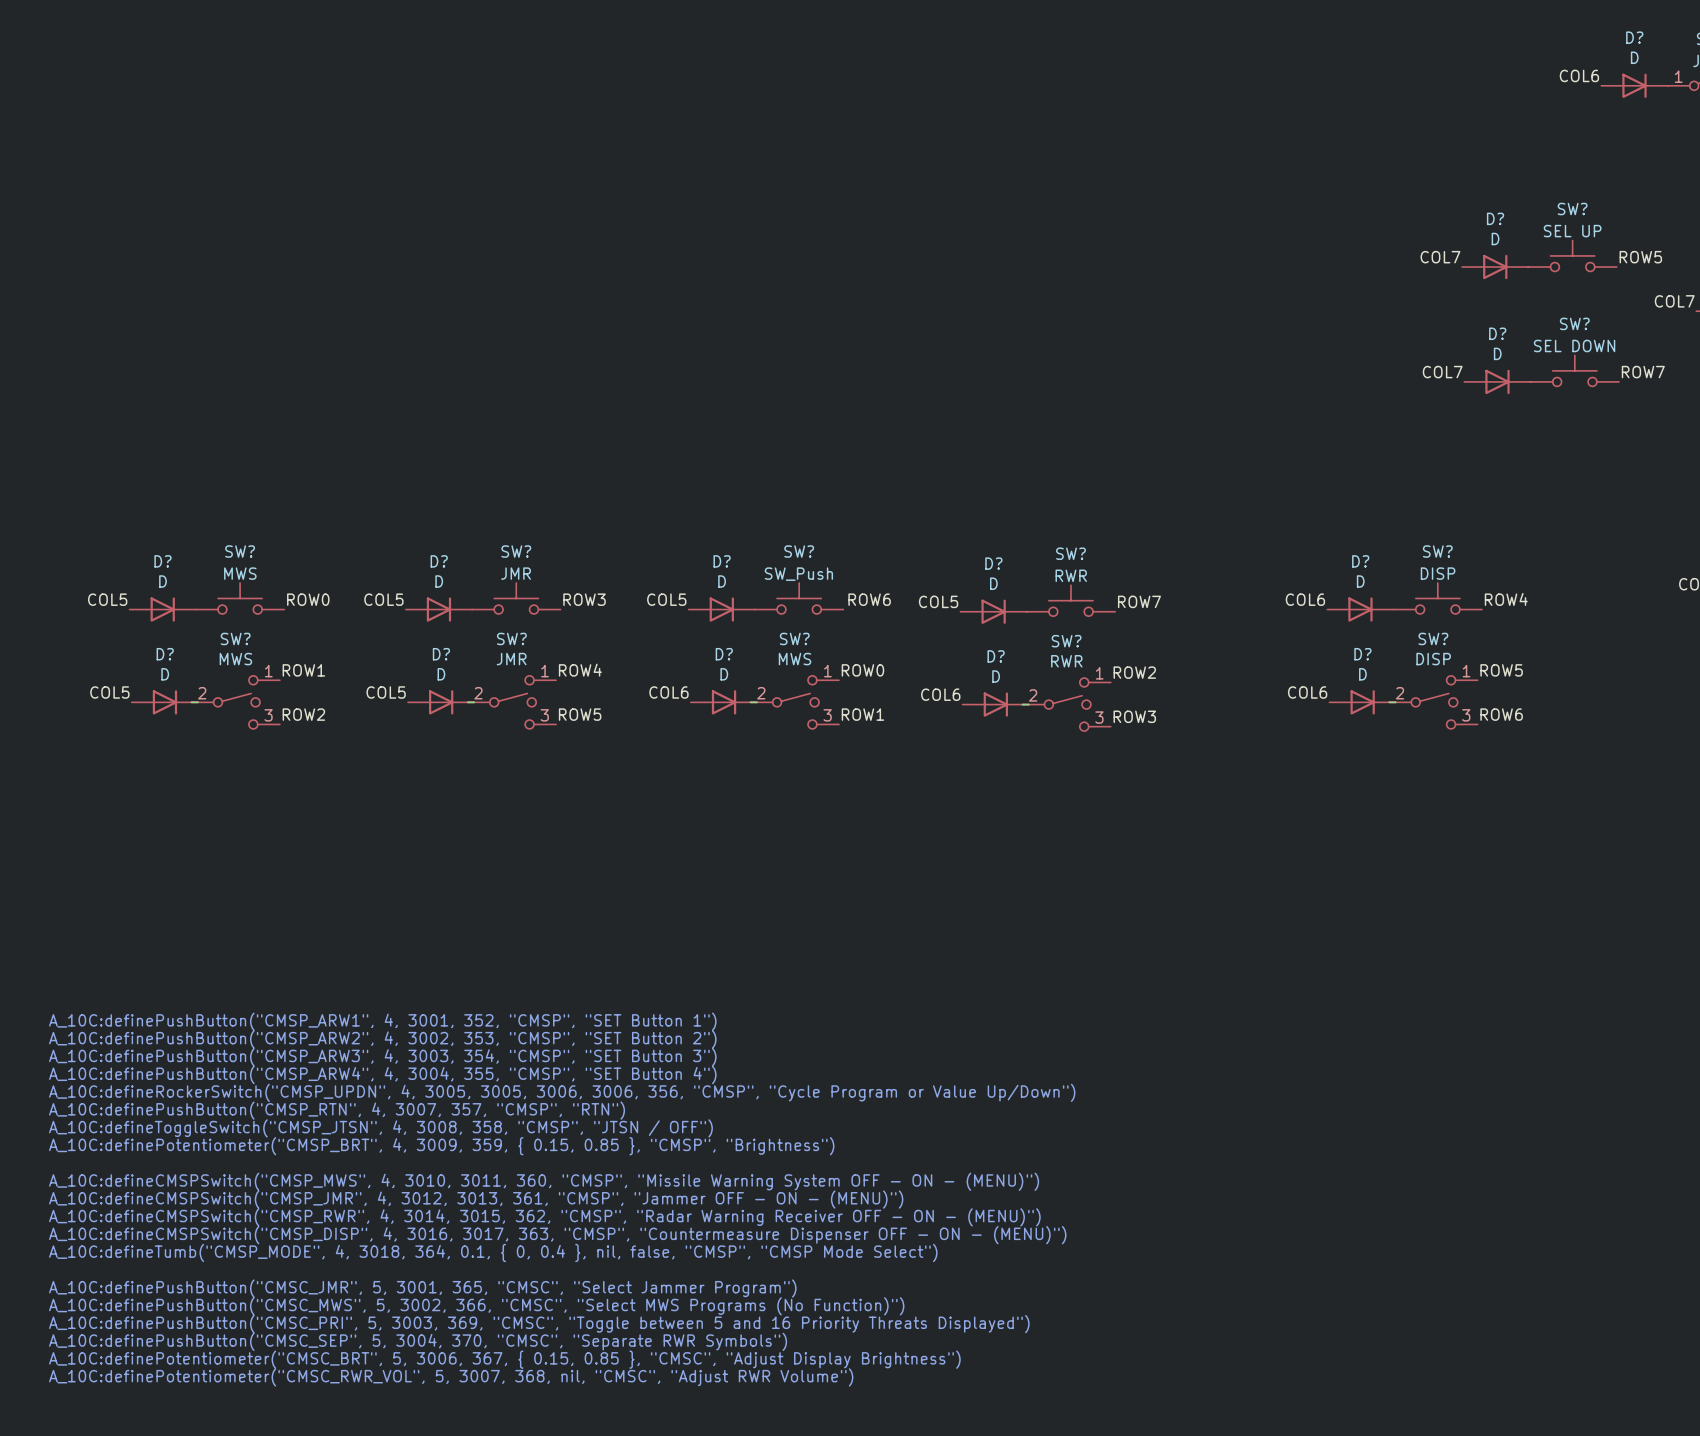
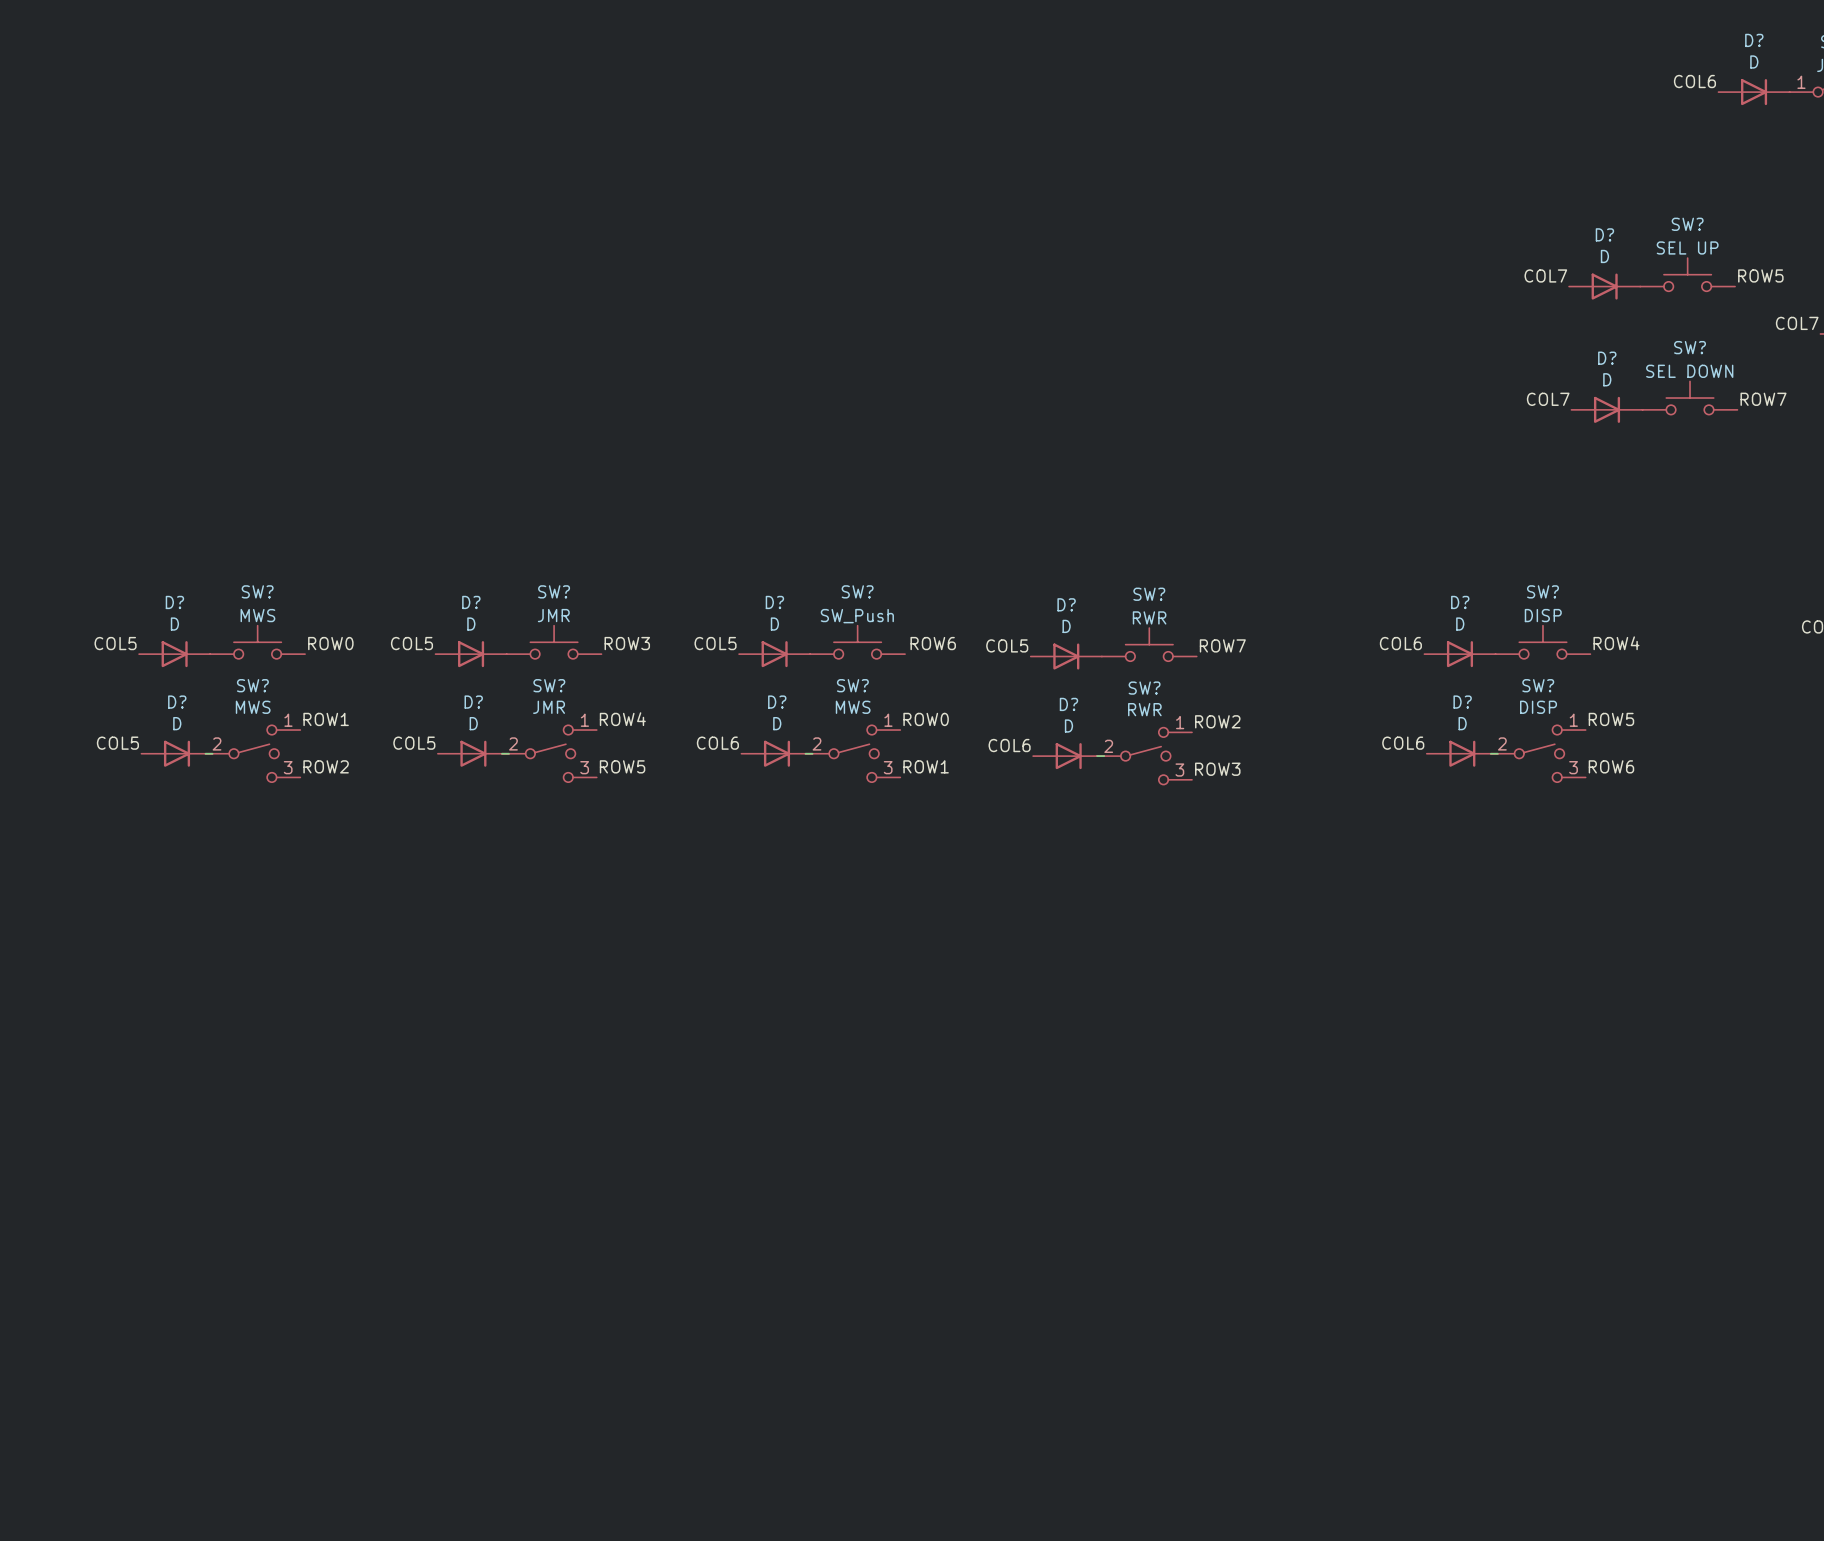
text: A_10C:definePushButton("CMSP_ARW1", 4, 3001, 352, "CMSP", "SET Button 1") (382, 1021) -> none
text: A_10C:definePushButton("CMSP_ARW2", 4, 3002, 353, "CMSP", "SET Button 2") (382, 1039) -> none
text: A_10C:definePushButton("CMSP_ARW3", 4, 3003, 354, "CMSP", "SET Button 3") (382, 1057) -> none
text: A_10C:definePushButton("CMSP_ARW4", 4, 3004, 355, "CMSP", "SET Button 4") (382, 1075) -> none
text: A_10C:defineRockerSwitch("CMSP_UPDN", 4, 3005, 3005, 3006, 3006, 356, "CMSP", "Cycle Program or Value Up/Down") (562, 1092) -> none
text: A_10C:definePushButton("CMSP_RTN", 4, 3007, 357, "CMSP", "RTN") (337, 1110) -> none
text: A_10C:defineToggleSwitch("CMSP_JTSN", 4, 3008, 358, "CMSP", "JTSN / OFF") (380, 1128) -> none
text: A_10C:definePotentiometer("CMSP_BRT", 4, 3009, 359, { 0.15, 0.85 }, "CMSP", "Brightness") (441, 1146) -> none
text: A_10C:defineCMSPSwitch("CMSP_MWS", 4, 3010, 3011, 360, "CMSP", "Missile Warning System OFF - ON - (MENU)") (544, 1181) -> none
text: A_10C:defineCMSPSwitch("CMSP_JMR", 4, 3012, 3013, 361, "CMSP", "Jammer OFF - ON - (MENU)") (476, 1199) -> none
text: A_10C:defineCMSPSwitch("CMSP_RWR", 4, 3014, 3015, 362, "CMSP", "Radar Warning Receiver OFF - ON - (MENU)") (544, 1217) -> none
text: A_10C:defineCMSPSwitch("CMSP_DISP", 4, 3016, 3017, 363, "CMSP", "Countermeasure Dispenser OFF - ON - (MENU)") (557, 1235) -> none
text: A_10C:defineTumb("CMSP_MODE", 4, 3018, 364, 0.1, { 0, 0.4 }, nil, false, "CMSP", "CMSP Mode Select") (493, 1252) -> none
text: A_10C:definePushButton("CMSC_JMR", 5, 3001, 365, "CMSC", "Select Jammer Program") (422, 1288) -> none
text: A_10C:definePushButton("CMSC_MWS", 5, 3002, 366, "CMSC", "Select MWS Programs (No Function)") (476, 1306) -> none
text: A_10C:definePushButton("CMSC_PRI", 5, 3003, 369, "CMSC", "Toggle between 5 and 16 Priority Threats Displayed") (539, 1324) -> none
text: A_10C:definePushButton("CMSC_SEP", 5, 3004, 370, "CMSC", "Separate RWR Symbols") (418, 1341) -> none
text: A_10C:definePotentiometer("CMSC_BRT", 5, 3006, 367, { 0.15, 0.85 }, "CMSC", "Adjust Display Brightness") (504, 1359) -> none
text: A_10C:definePotentiometer("CMSC_RWR_VOL", 5, 3007, 368, nil, "CMSC", "Adjust RWR Volume") (451, 1377) -> none

